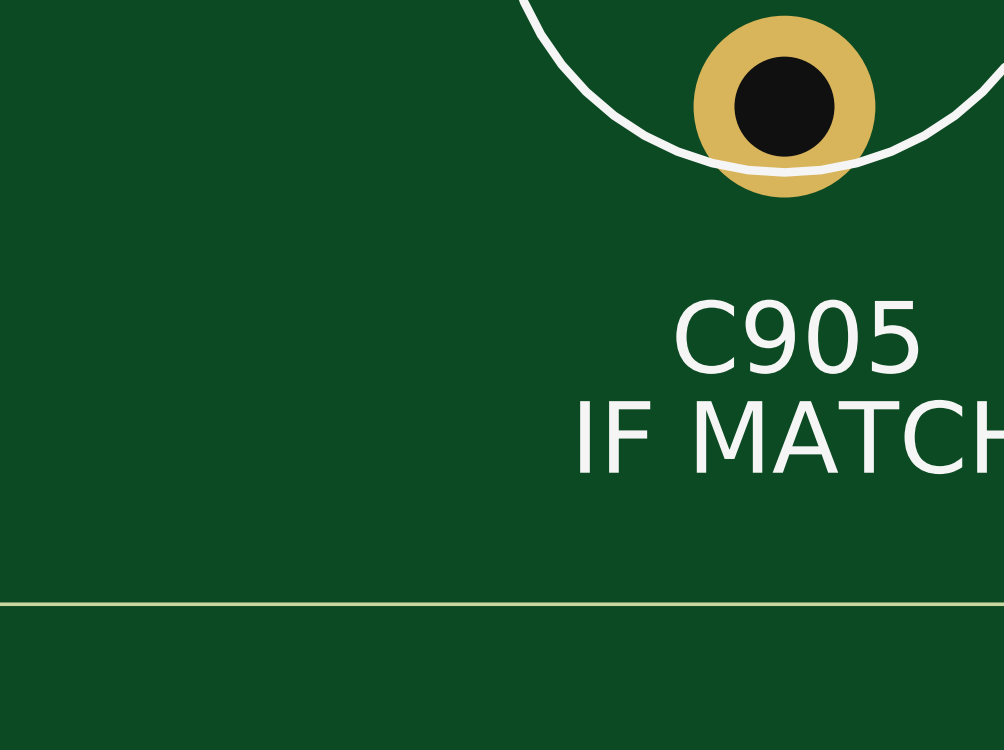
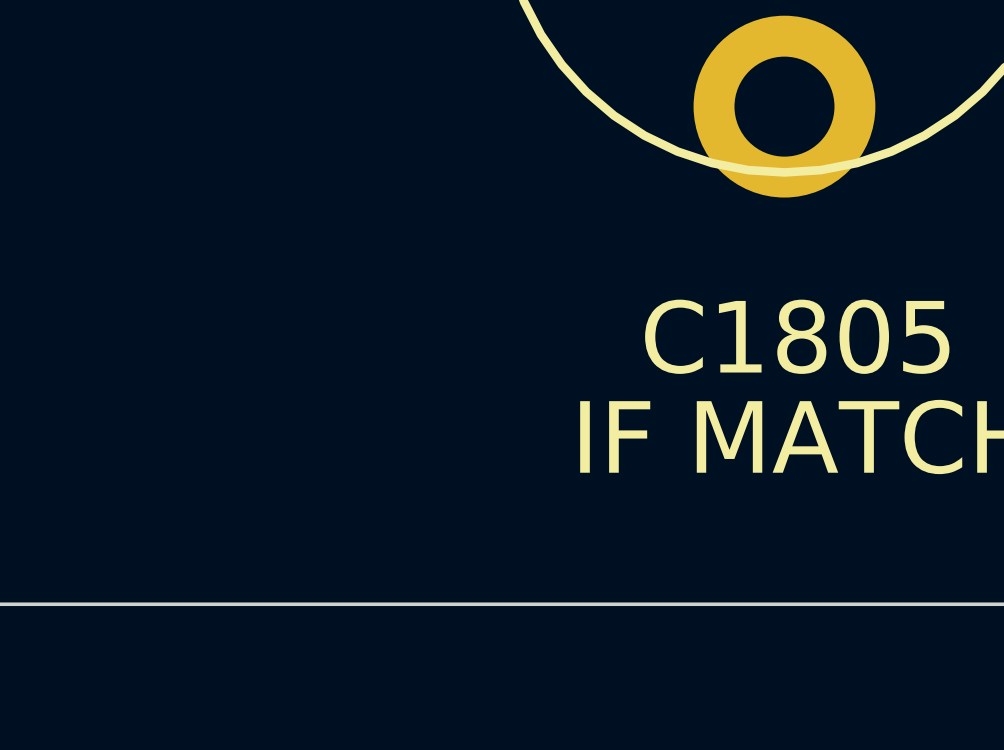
C905 name: C905 (797, 336) -> C1805 (797, 336)

